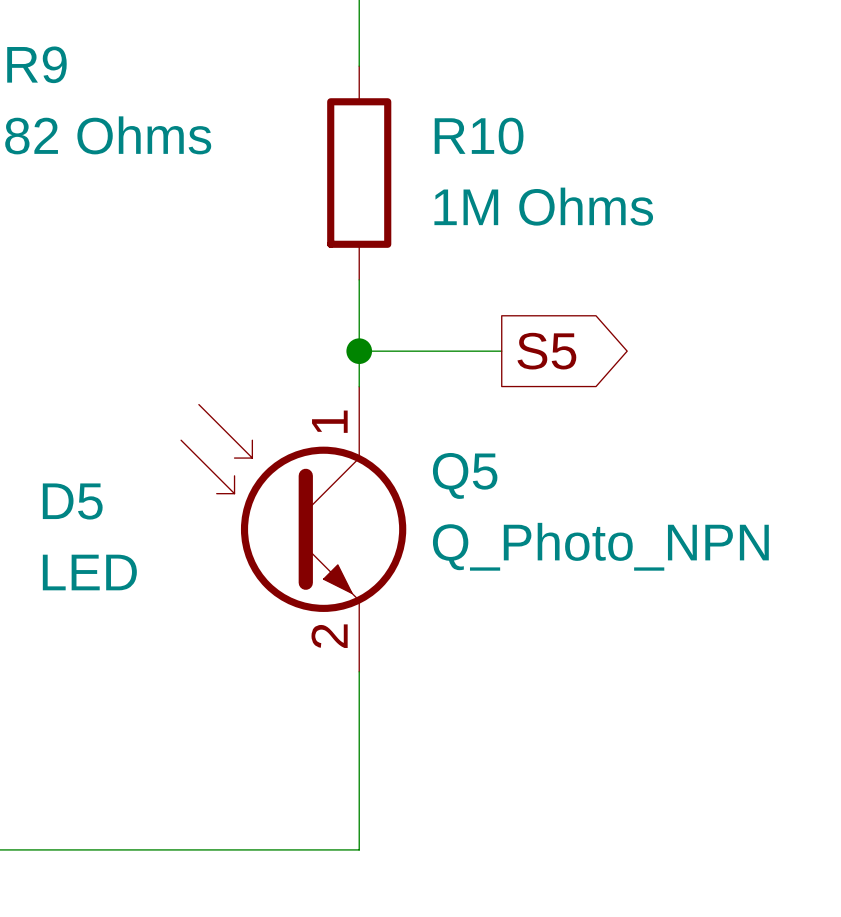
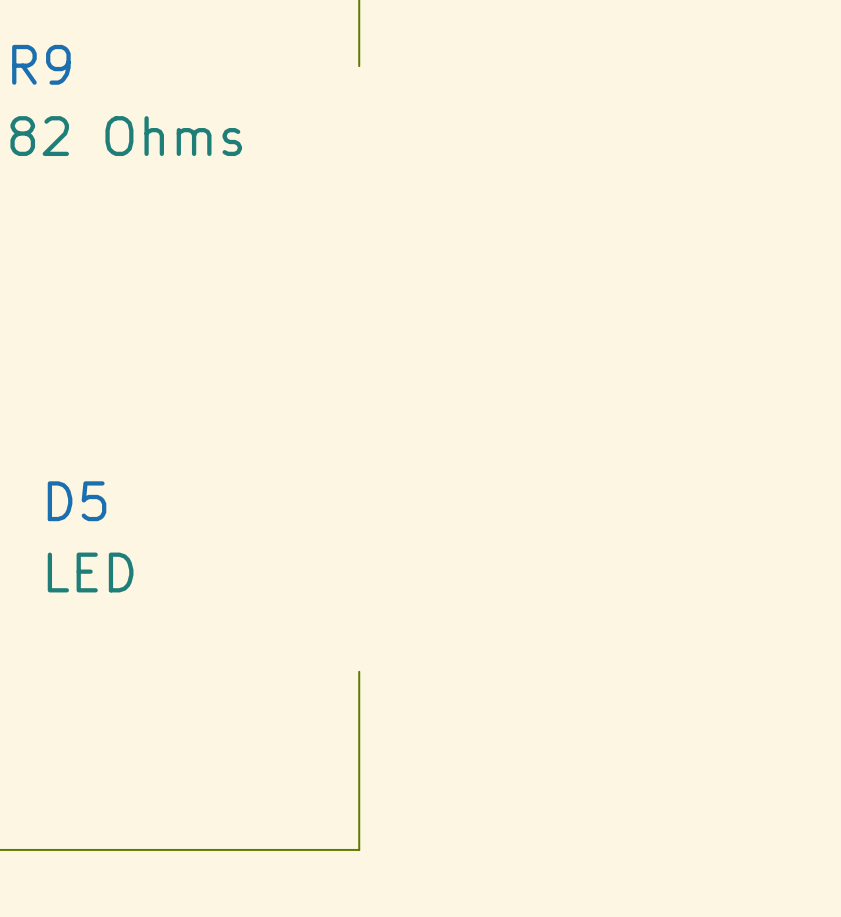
R10: 1M Ohms (359, 173) -> none
wire: (359, 279) (359, 386) -> none
wire: (359, 351) (501, 351) -> none
junction: (359, 351) -> none
global label: S5 (546, 351) -> none
Q5: Q_Photo_NPN (293, 529) -> none

